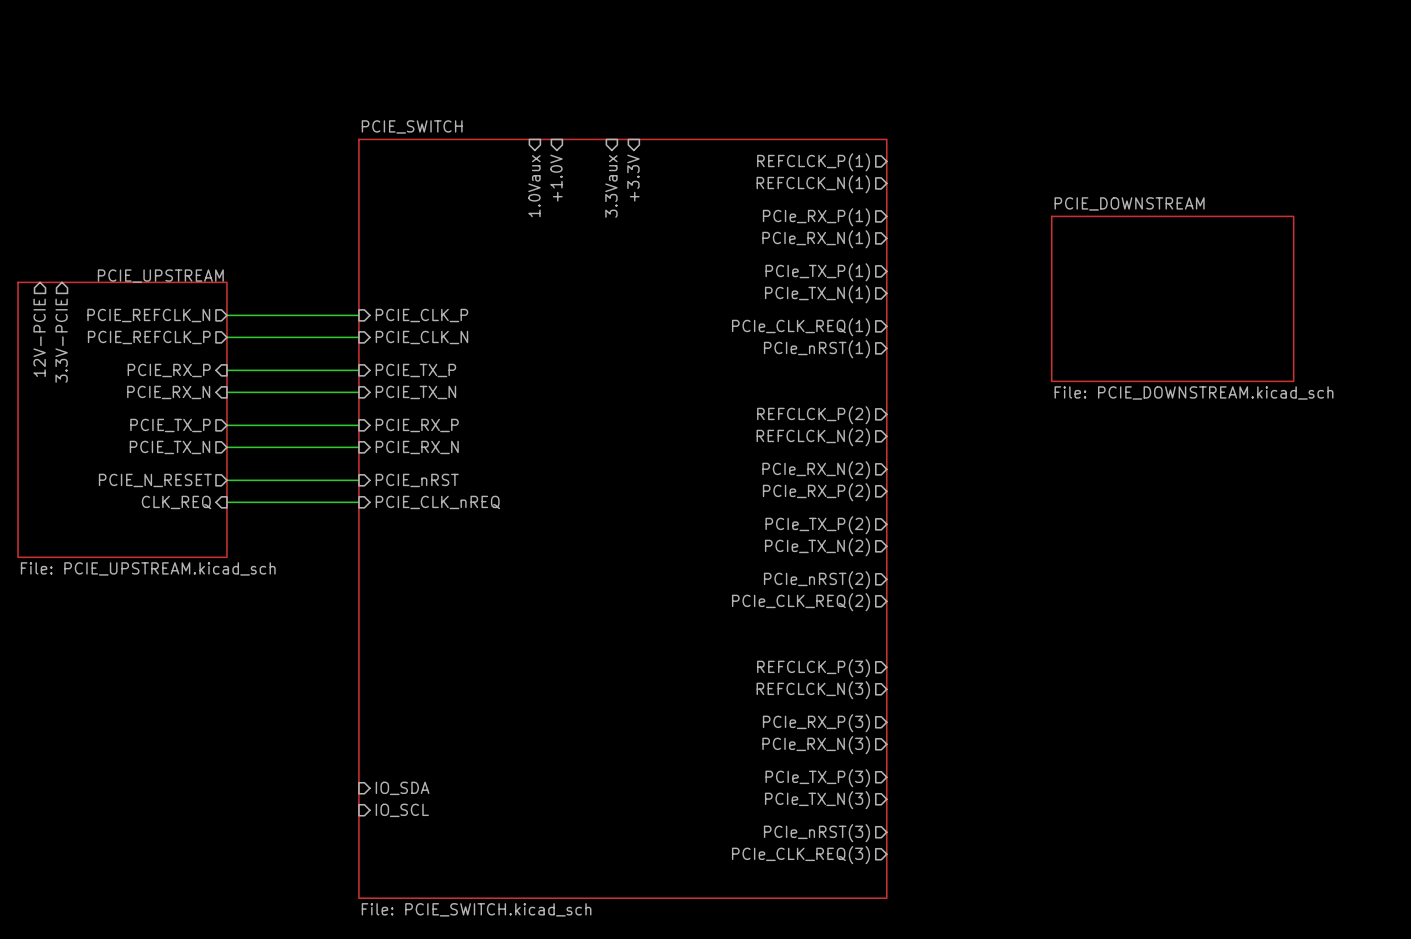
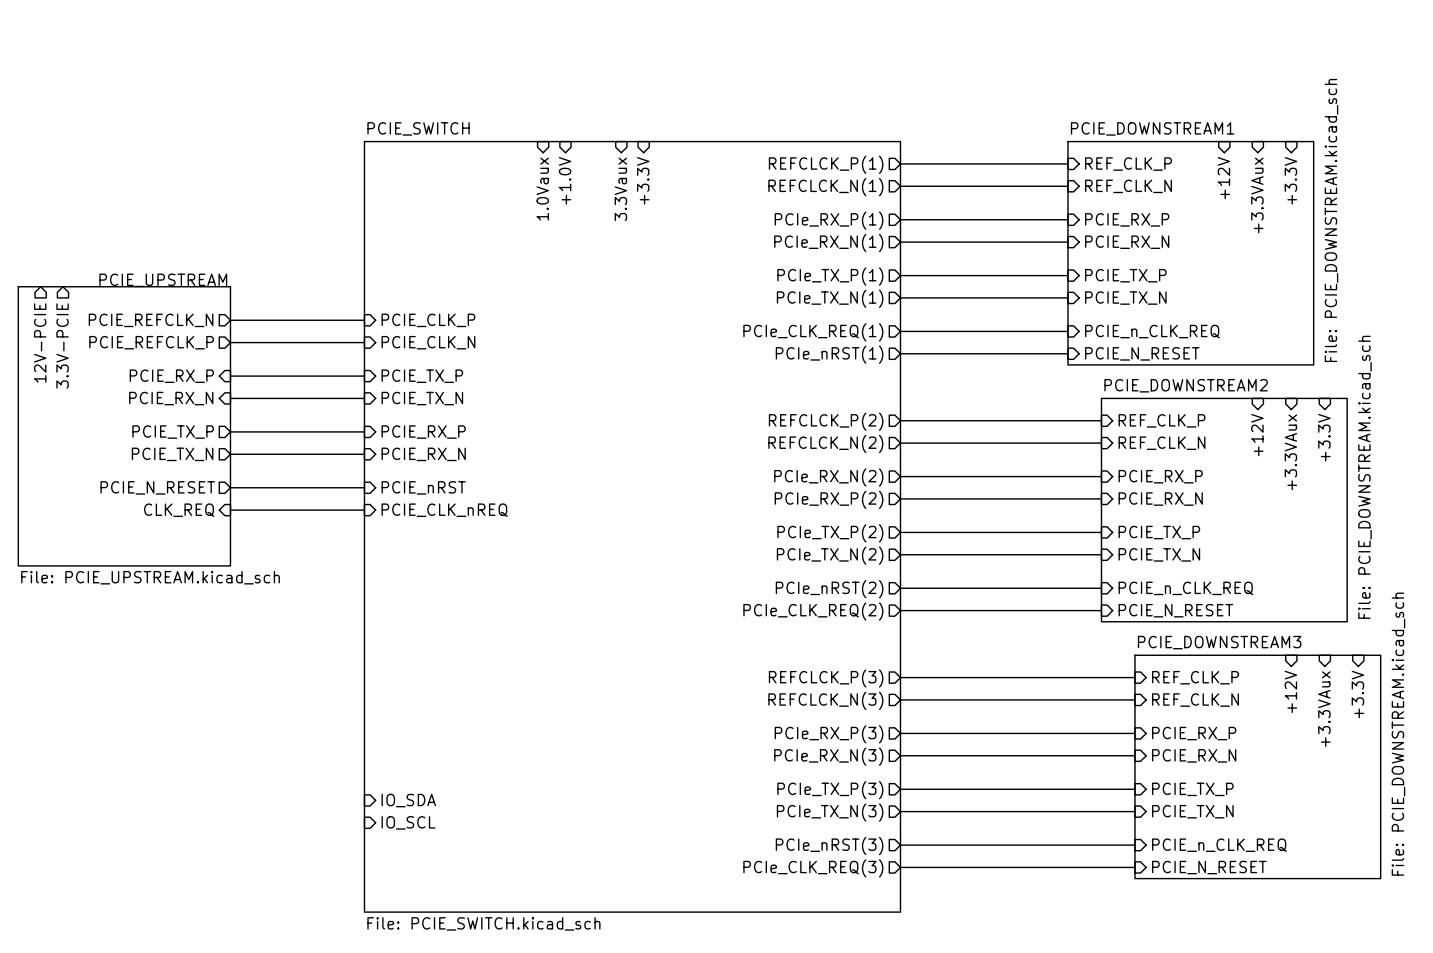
wire: none -> (900, 163) (1067, 163)
sheet pin: none -> REF_CLK_P (1128, 164)
sheet pin: none -> +12V (1223, 178)
sheet pin: none -> +3.3V (1290, 180)
wire: none -> (900, 186) (1067, 186)
sheet pin: none -> REF_CLK_N (1128, 186)
sheet pin: none -> +3.3VAux (1257, 195)
wire: none -> (900, 219) (1067, 219)
sheet pin: none -> PCIE_RX_P (1127, 219)
wire: none -> (900, 242) (1067, 242)
sheet pin: none -> PCIE_RX_N (1127, 242)
sheet PCIE_DOWNSTREAM1: none -> File: PCIE_DOWNSTREAM.kicad_sch (1190, 253)
wire: none -> (900, 275) (1067, 275)
sheet pin: none -> PCIE_TX_P (1125, 275)
wire: none -> (900, 297) (1067, 297)
sheet pin: none -> PCIE_TX_N (1125, 298)
sheet PCIE_DOWNSTREAM: File: PCIE_DOWNSTREAM.kicad_sch (1172, 298) -> none
wire: none -> (900, 331) (1067, 331)
sheet pin: none -> PCIE_n_CLK_REQ (1152, 331)
wire: none -> (900, 353) (1067, 353)
sheet pin: none -> PCIE_N_RESET (1142, 353)
wire: none -> (900, 420) (1101, 420)
sheet pin: none -> REF_CLK_P (1162, 420)
sheet pin: none -> +12V (1257, 435)
sheet pin: none -> +3.3V (1324, 437)
wire: none -> (900, 443) (1101, 443)
sheet pin: none -> REF_CLK_N (1162, 443)
sheet pin: none -> +3.3VAux (1290, 452)
wire: none -> (900, 476) (1101, 476)
sheet pin: none -> PCIE_RX_P (1160, 476)
wire: none -> (900, 498) (1101, 498)
sheet pin: none -> PCIE_RX_N (1160, 499)
sheet PCIE_DOWNSTREAM2: none -> File: PCIE_DOWNSTREAM.kicad_sch (1224, 510)
wire: none -> (900, 532) (1101, 532)
sheet pin: none -> PCIE_TX_P (1159, 532)
wire: none -> (900, 554) (1101, 554)
sheet pin: none -> PCIE_TX_N (1159, 554)
wire: none -> (900, 588) (1101, 588)
sheet pin: none -> PCIE_n_CLK_REQ (1185, 588)
wire: none -> (900, 610) (1101, 610)
sheet pin: none -> PCIE_N_RESET (1175, 610)
wire: none -> (900, 677) (1134, 677)
sheet pin: none -> REF_CLK_P (1195, 677)
sheet pin: none -> +12V (1290, 691)
sheet pin: none -> +3.3V (1357, 694)
wire: none -> (900, 699) (1134, 699)
sheet pin: none -> REF_CLK_N (1195, 700)
sheet pin: none -> +3.3VAux (1324, 709)
wire: none -> (900, 733) (1134, 733)
sheet pin: none -> PCIE_RX_P (1194, 733)
wire: none -> (900, 755) (1134, 755)
sheet pin: none -> PCIE_RX_N (1194, 755)
sheet PCIE_DOWNSTREAM3: none -> File: PCIE_DOWNSTREAM.kicad_sch (1257, 766)
wire: none -> (900, 789) (1134, 789)
sheet pin: none -> PCIE_TX_P (1192, 789)
wire: none -> (900, 811) (1134, 811)
sheet pin: none -> PCIE_TX_N (1192, 811)
wire: none -> (900, 845) (1134, 845)
sheet pin: none -> PCIE_n_CLK_REQ (1219, 845)
wire: none -> (900, 867) (1134, 867)
sheet pin: none -> PCIE_N_RESET (1209, 867)

